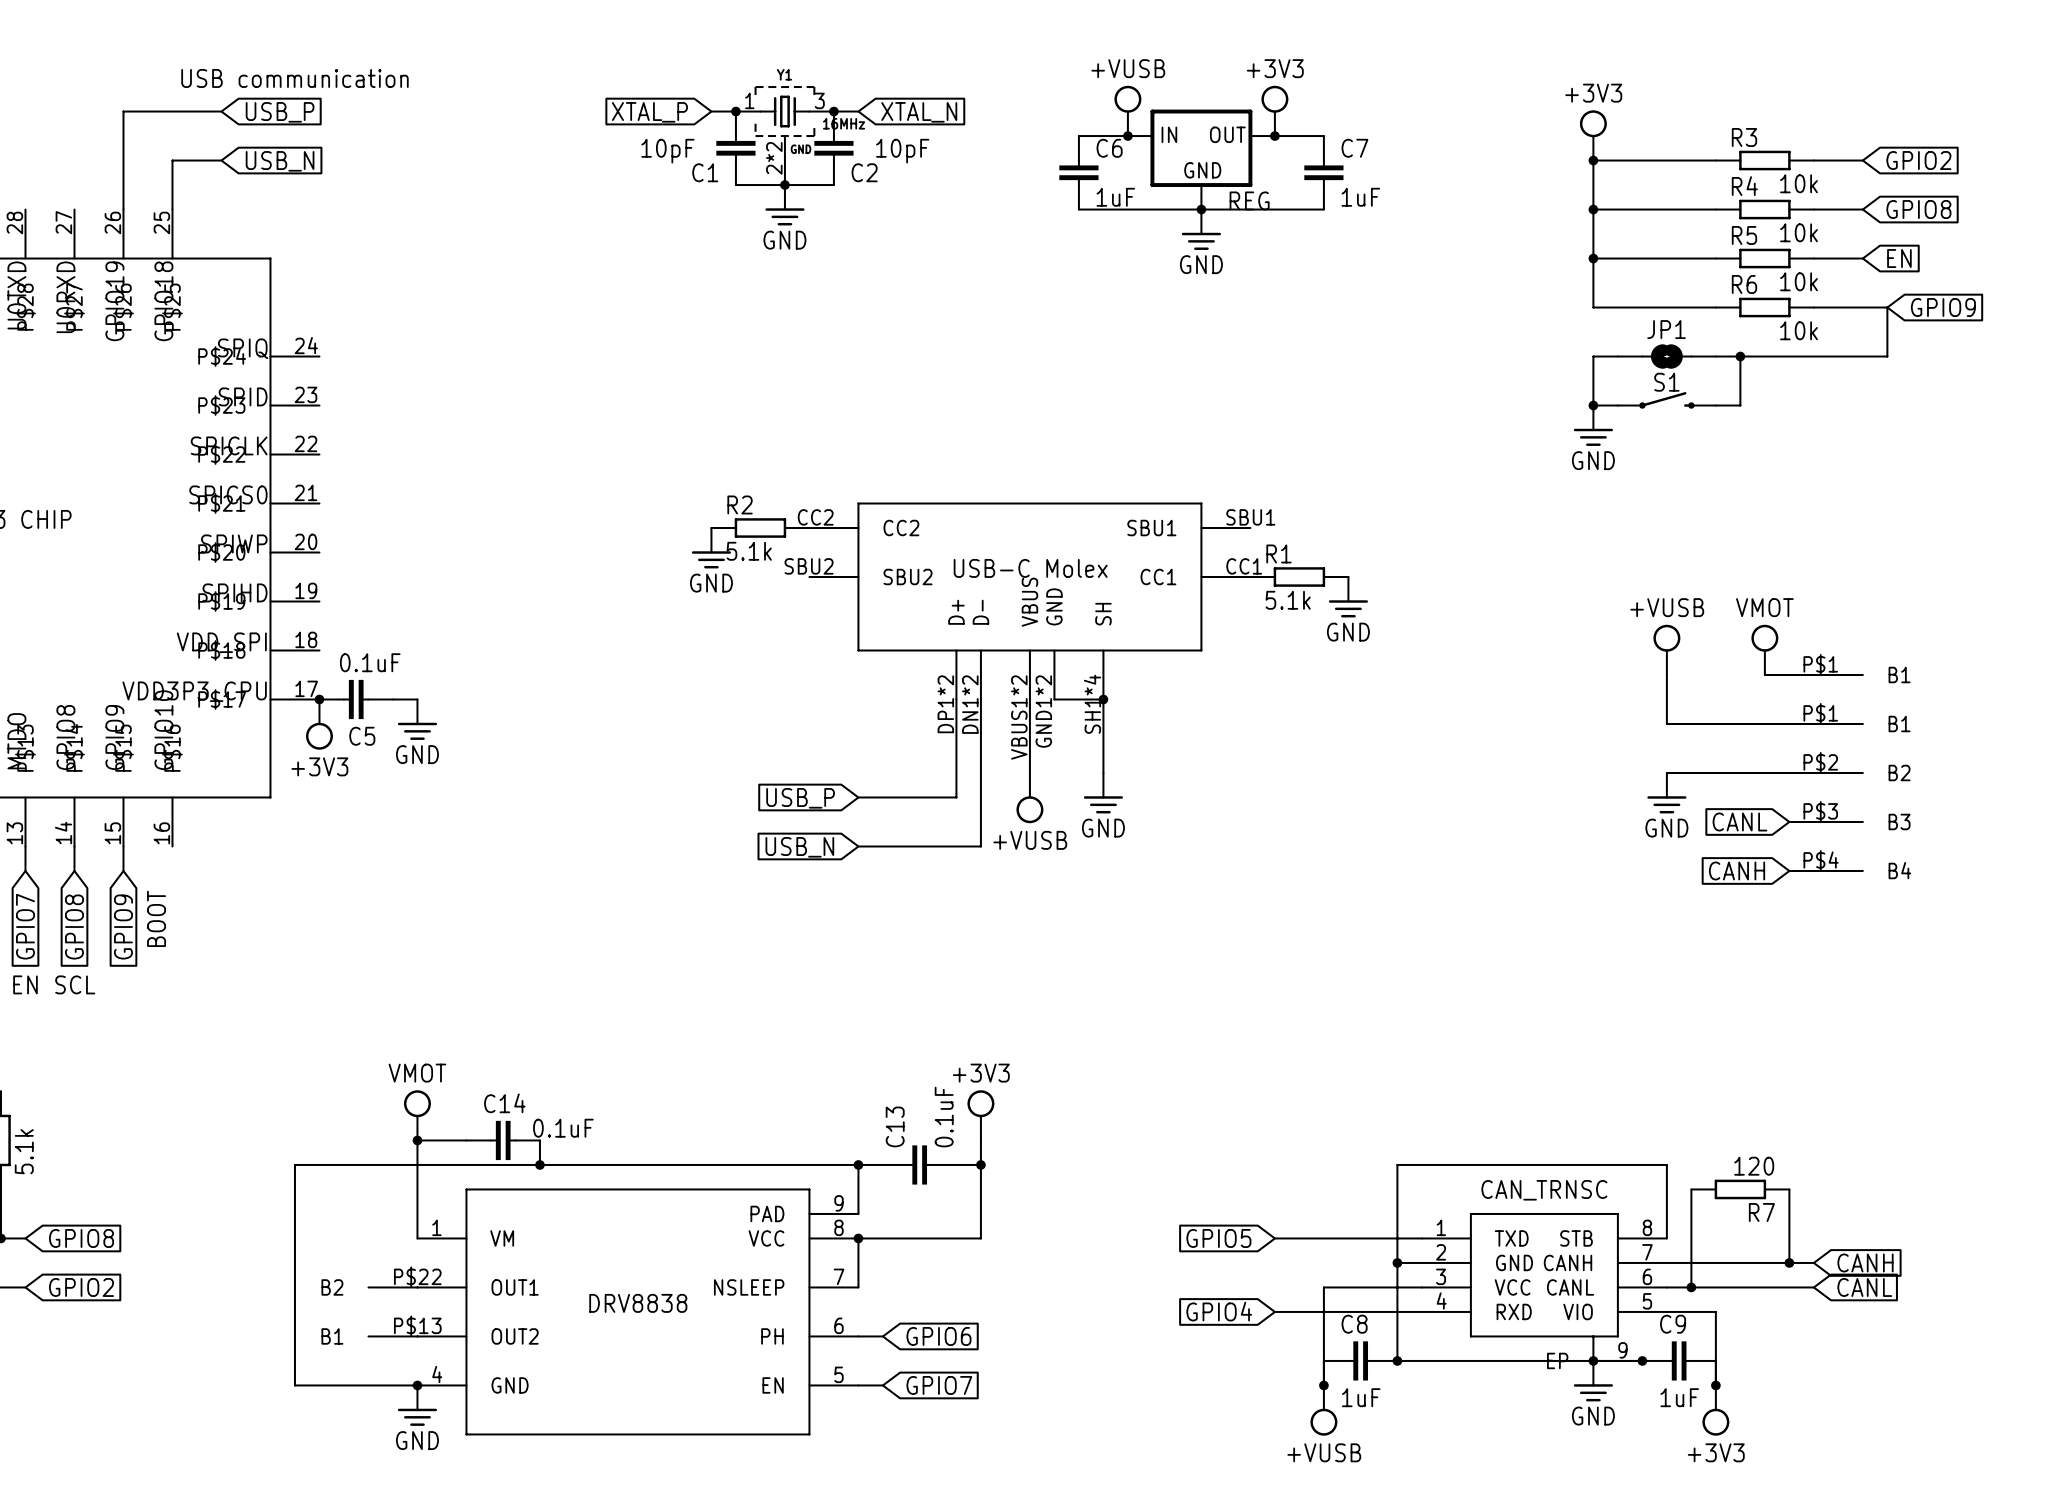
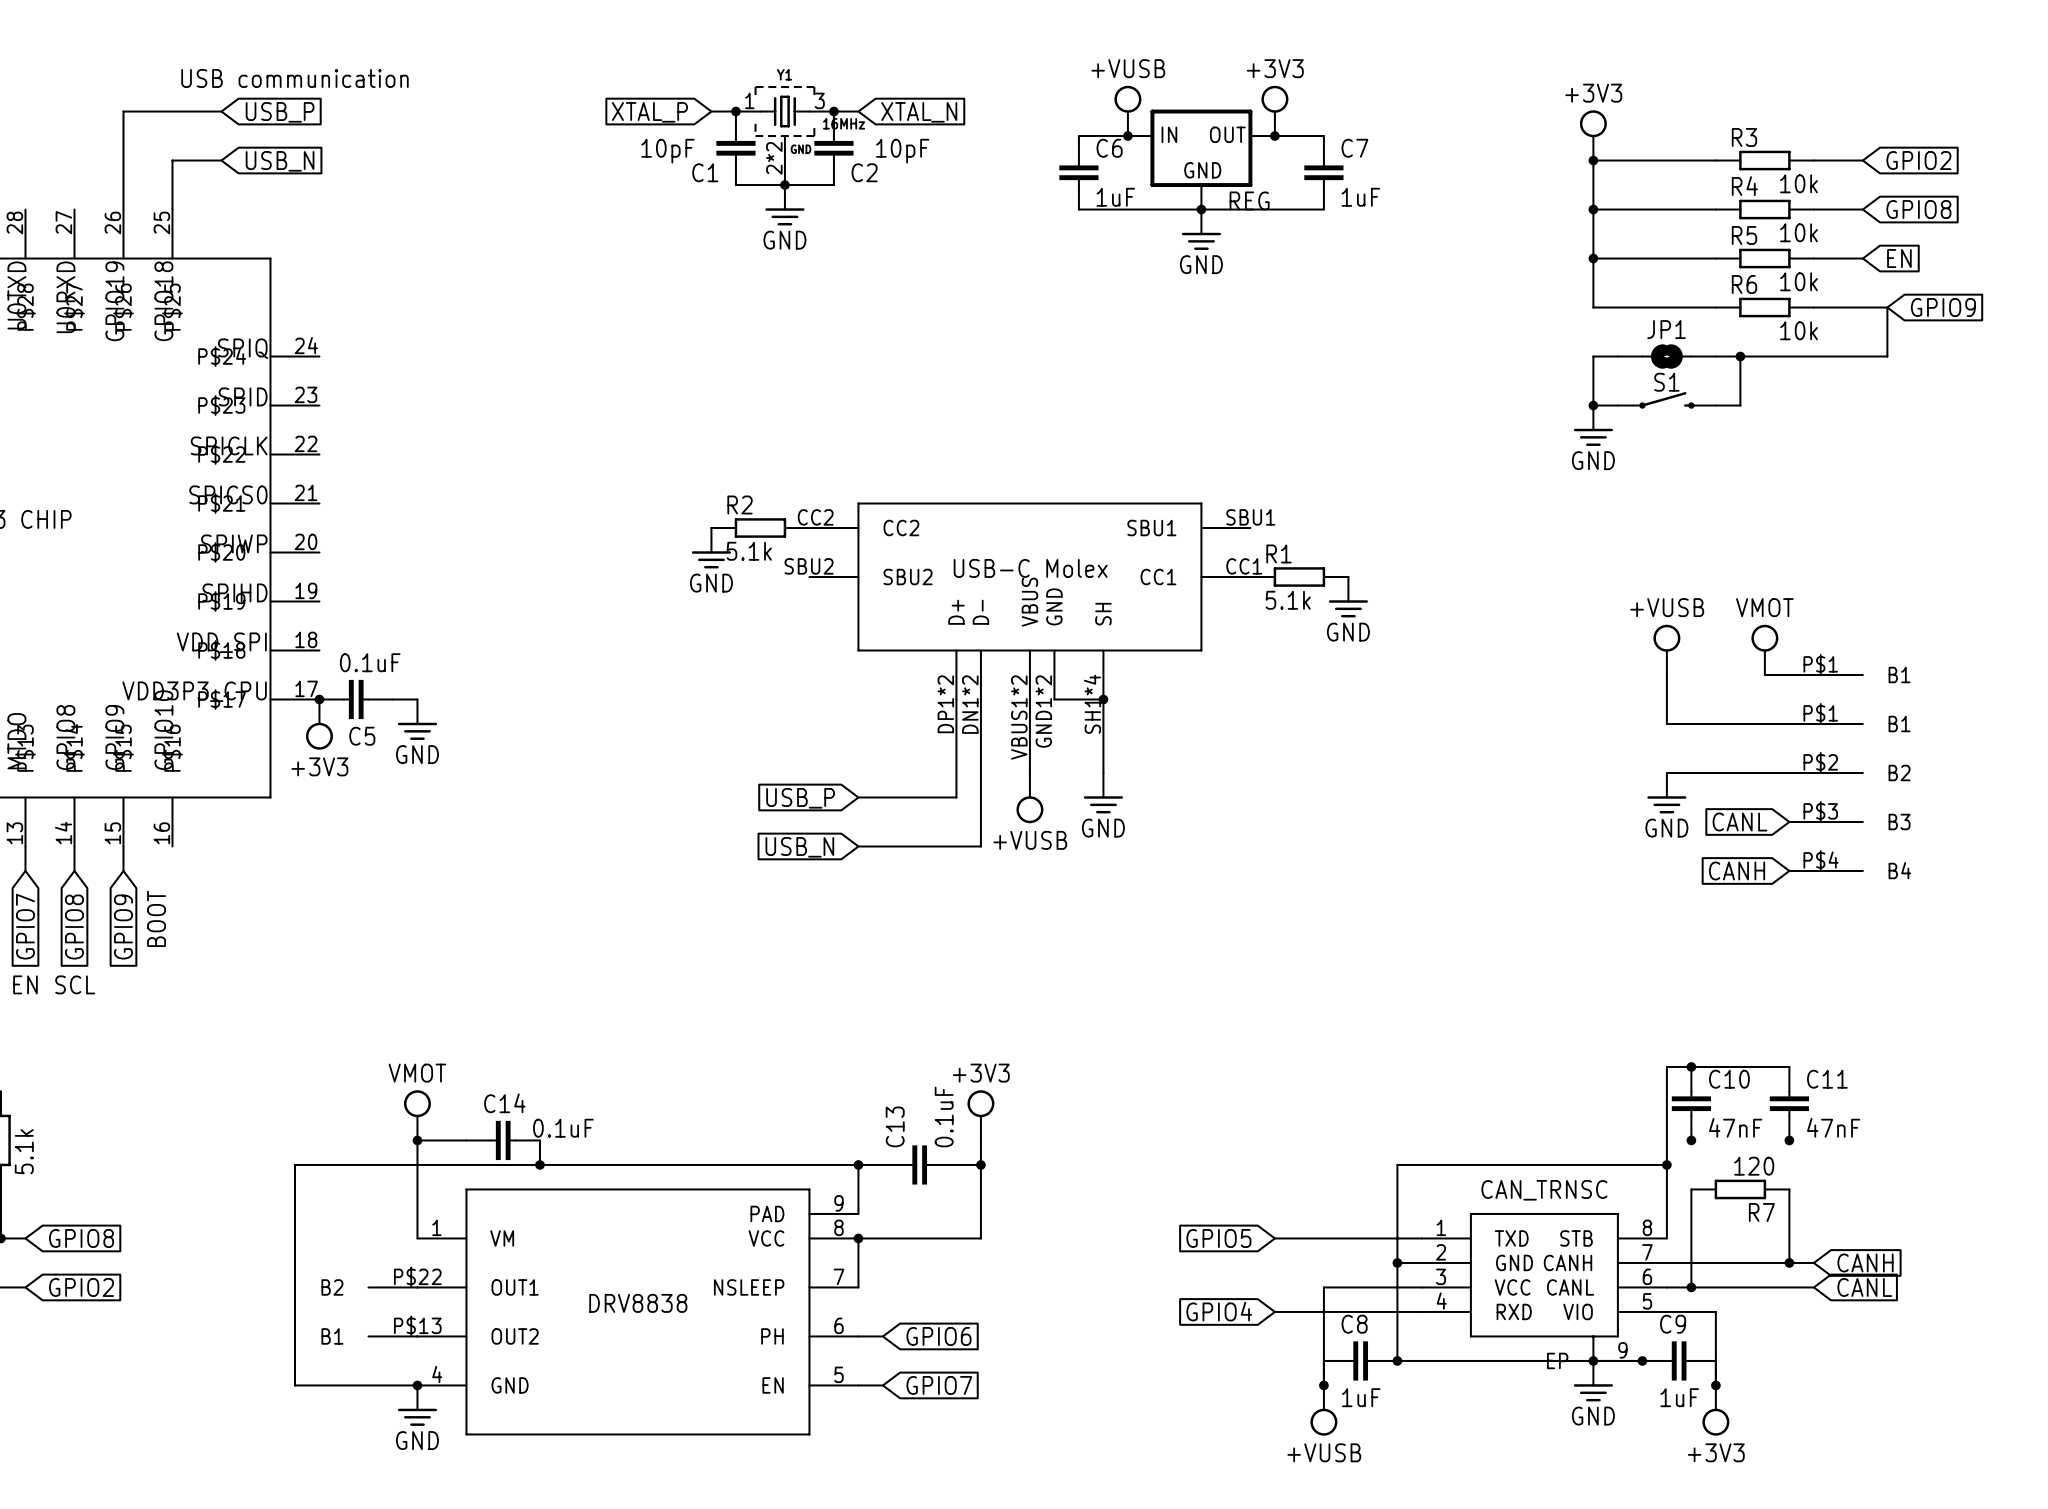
junction: none -> (1691, 1066)
wire: none -> (1789, 1066) (1666, 1066) (1666, 1164)
C10: none -> 47nF (1691, 1103)
C11: none -> 47nF (1789, 1103)
junction: none -> (1691, 1140)
junction: none -> (1789, 1140)
junction: none -> (1666, 1164)

